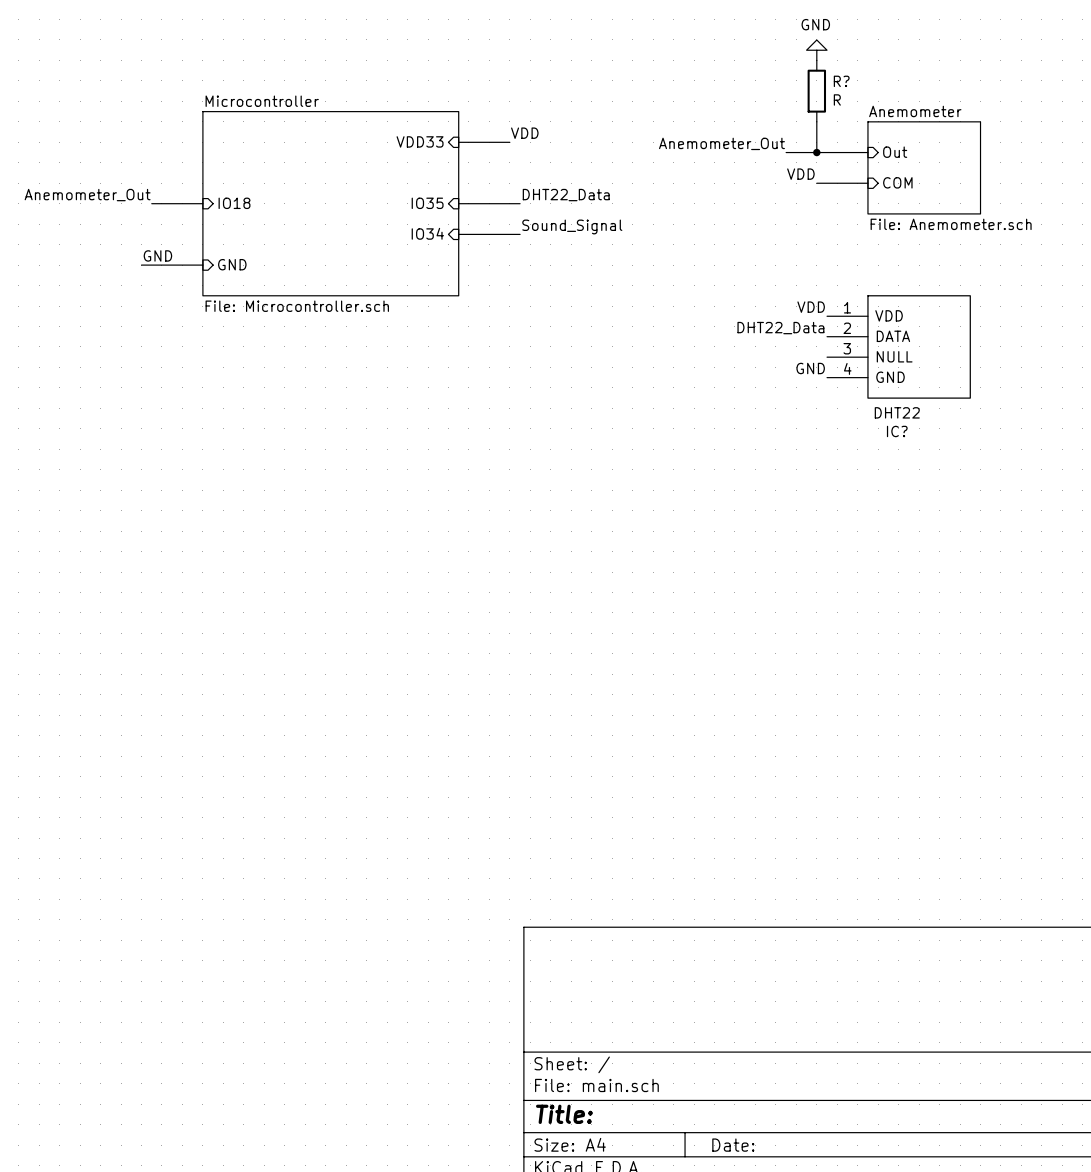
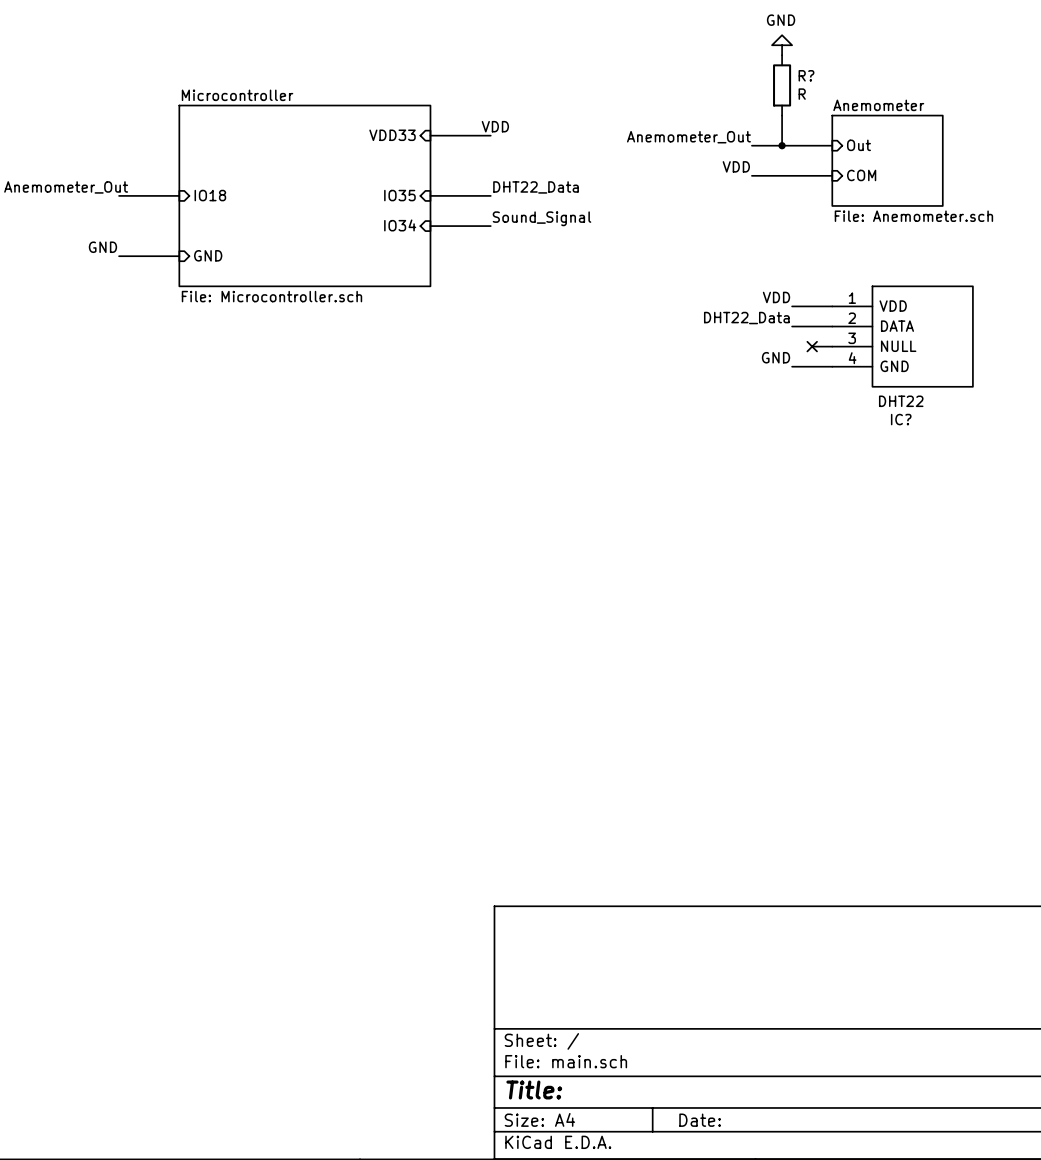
wire: none -> (480, 135) (490, 135)
label position: VDD (800, 174) -> VDD (736, 166)
wire: none -> (751, 175) (782, 175)
wire: none -> (119, 195) (129, 195)
label position: GND (157, 255) -> GND (102, 247)
IC? position: (898, 346) -> (902, 336)
no-connect mark: none -> (812, 346)

